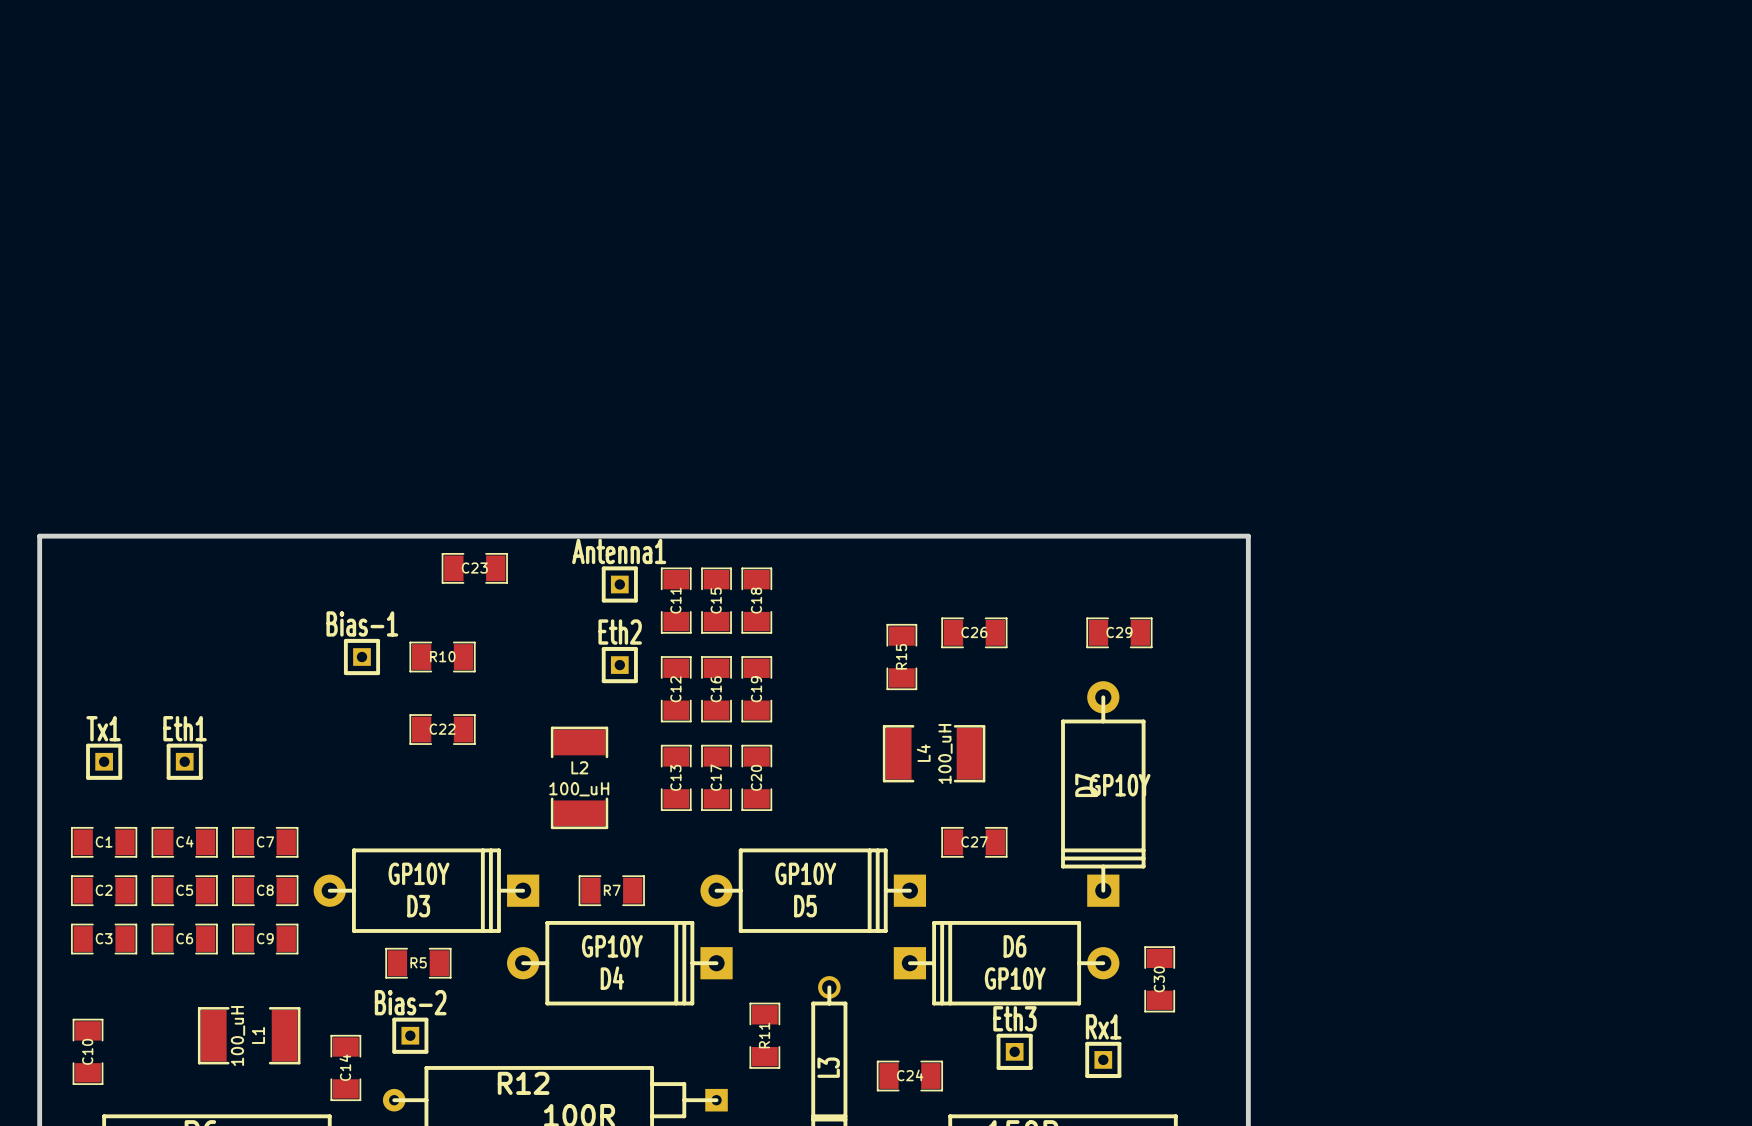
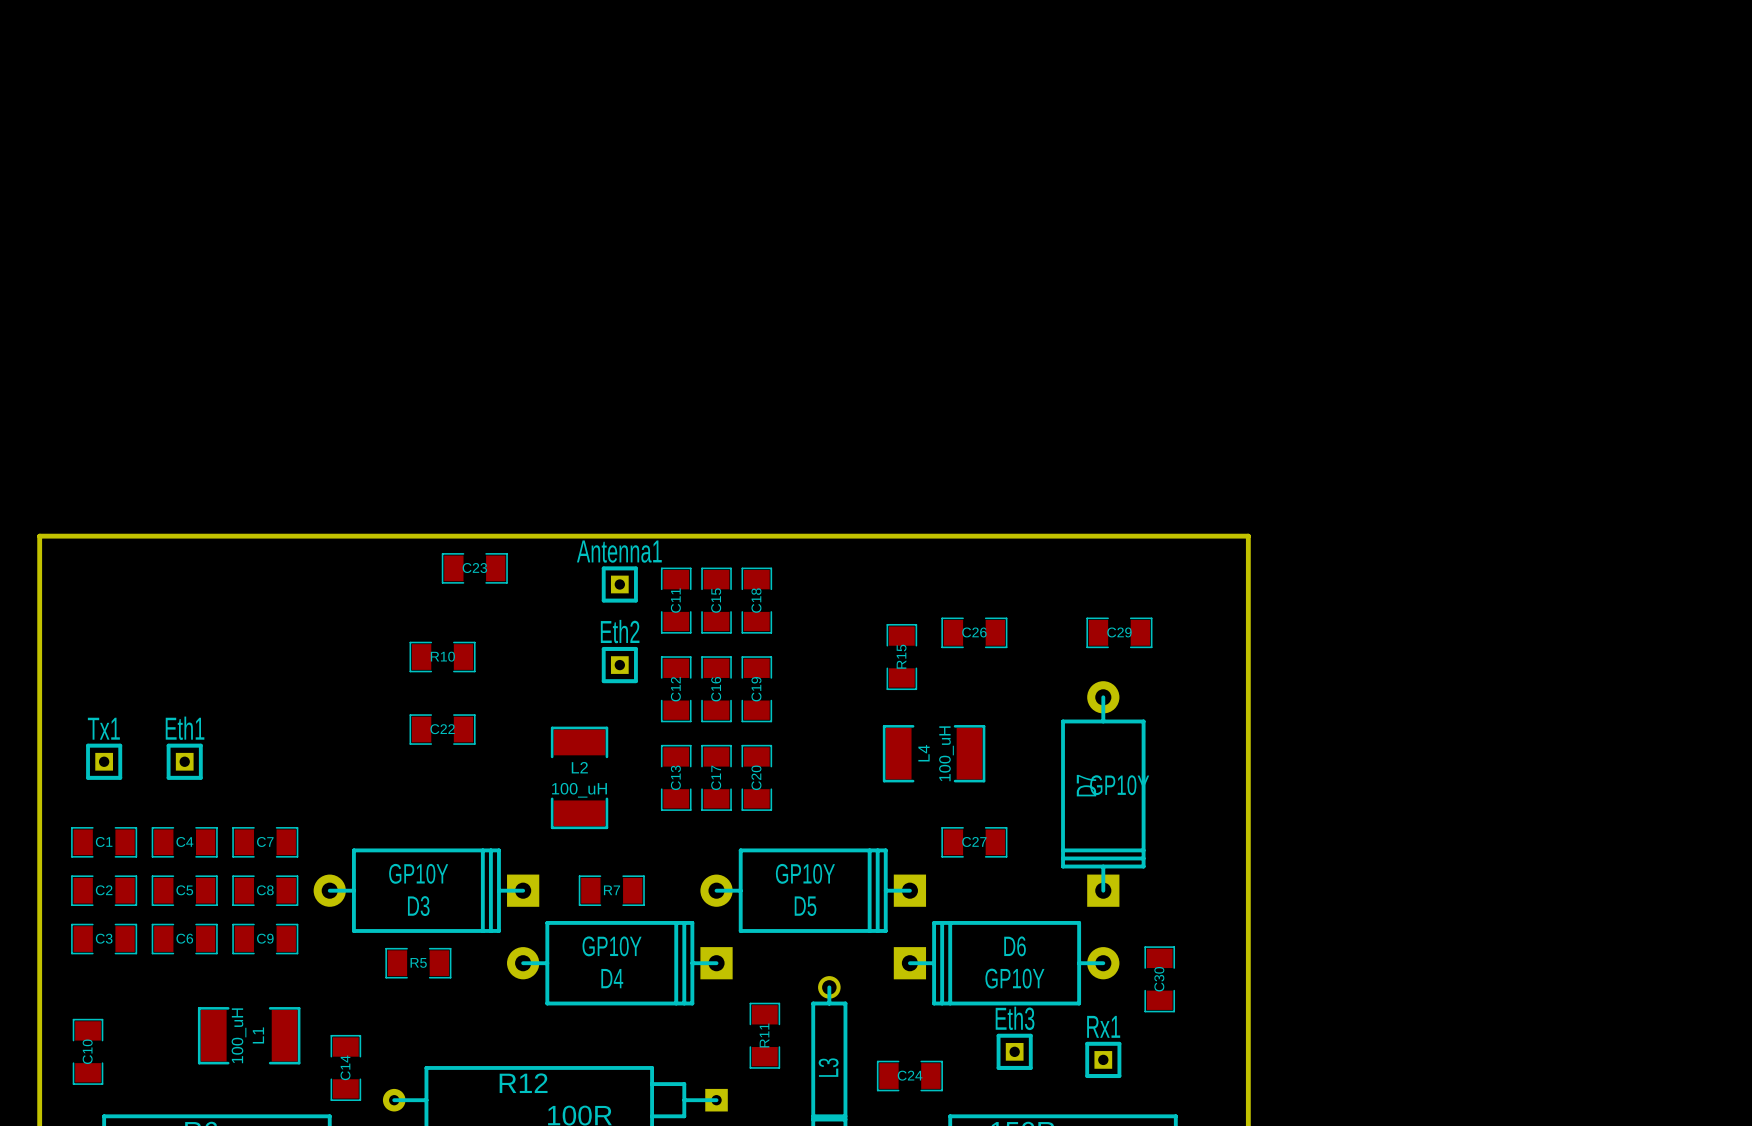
Bias-1: (361, 657) -> none
Bias-2: (410, 1035) -> none

